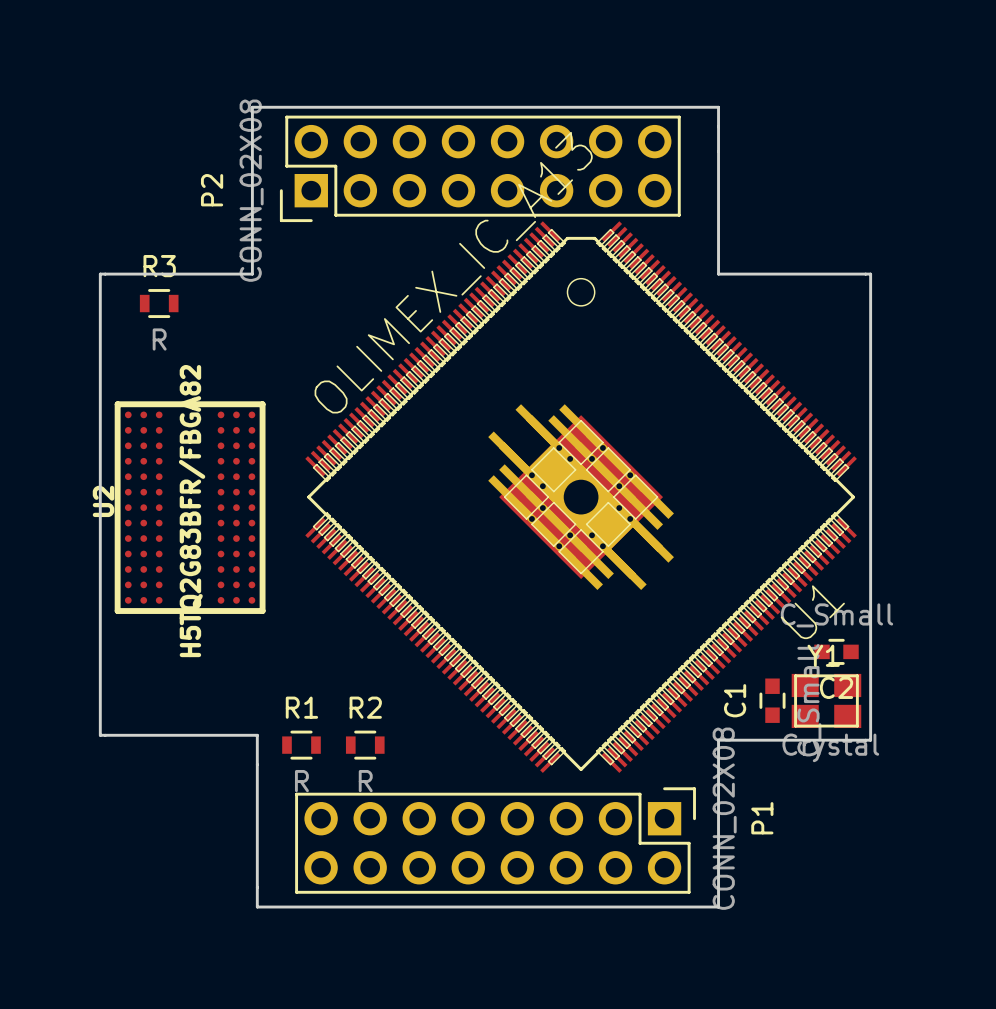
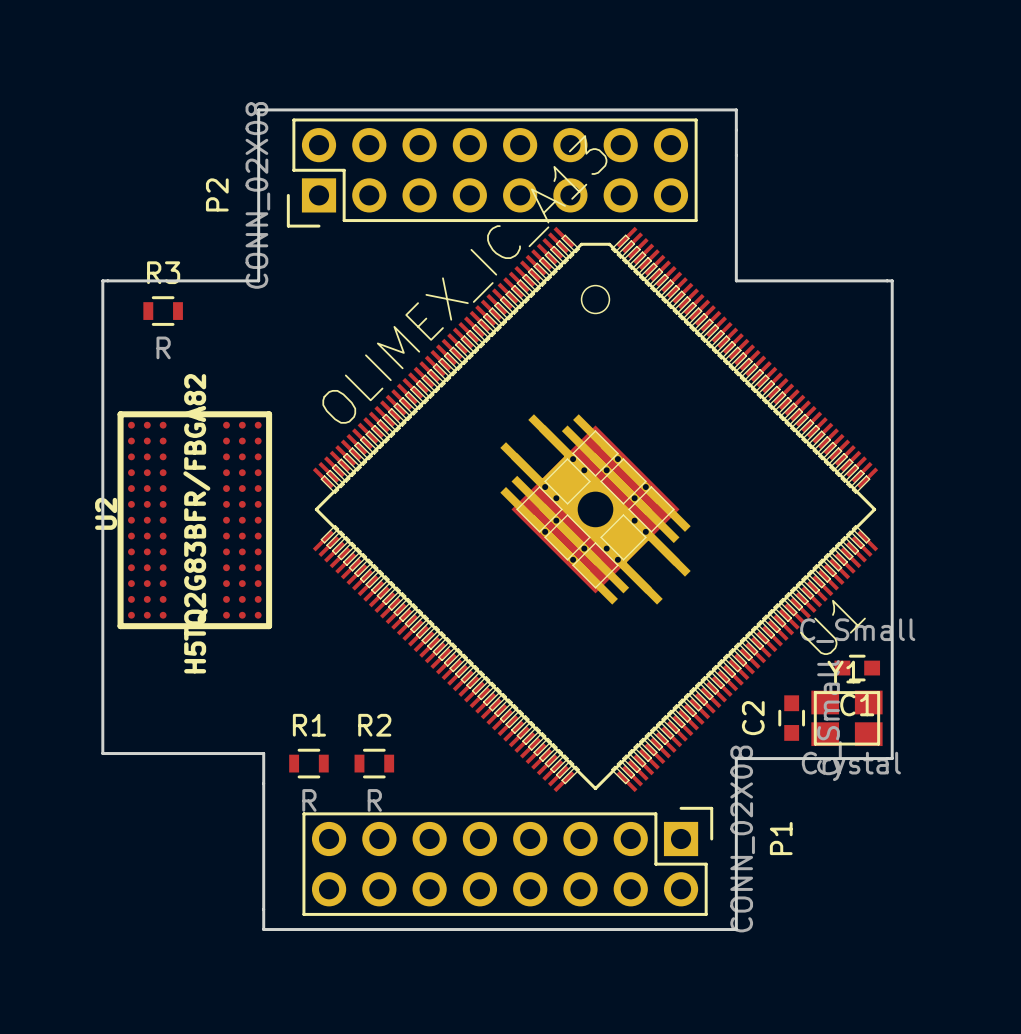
C2 name: C2 (836, 687) -> C1 (857, 704)
C1 name: C1 (735, 700) -> C2 (753, 718)

